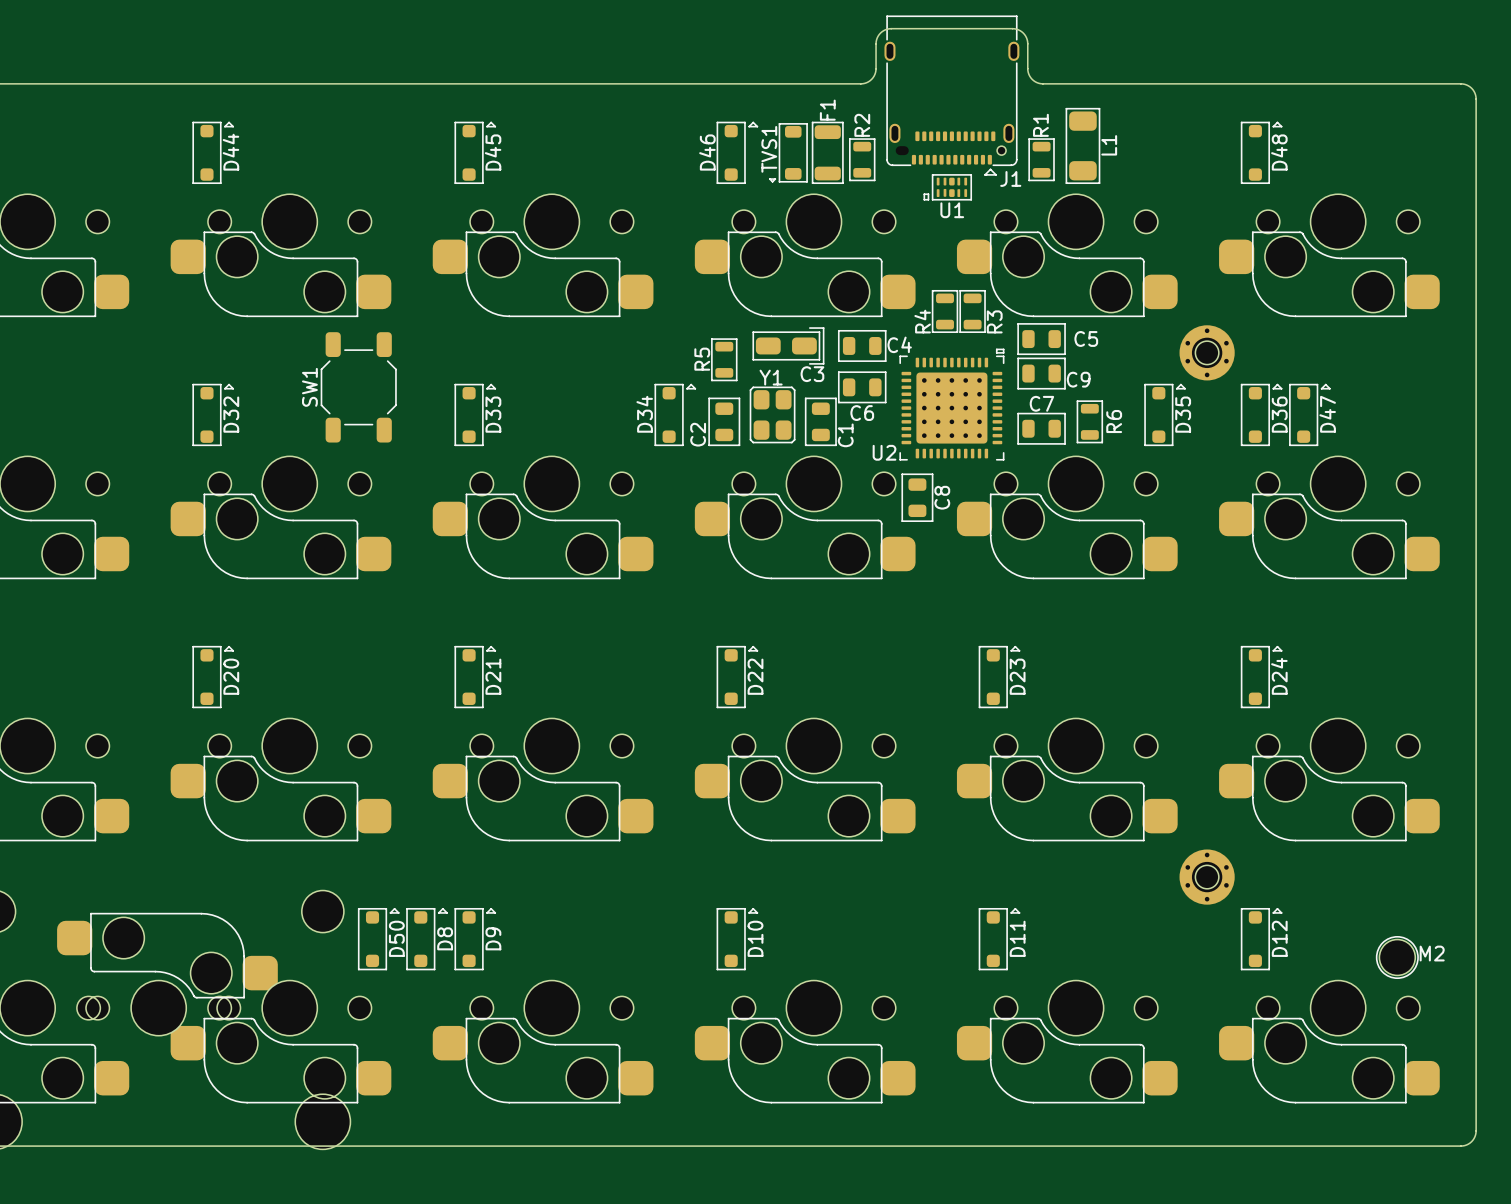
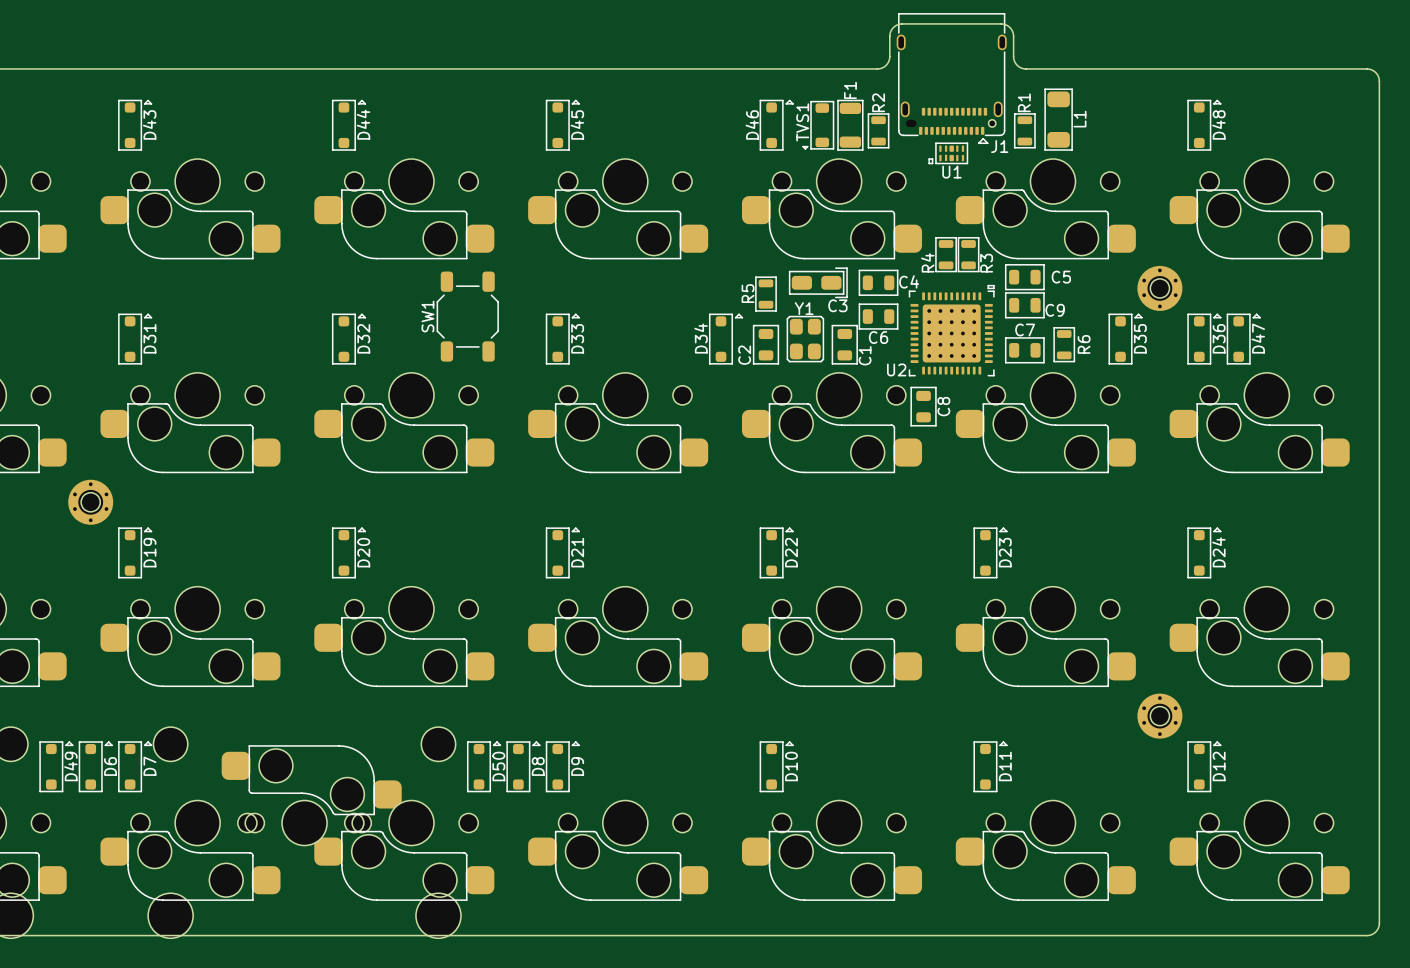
M2: (1397, 957) -> none

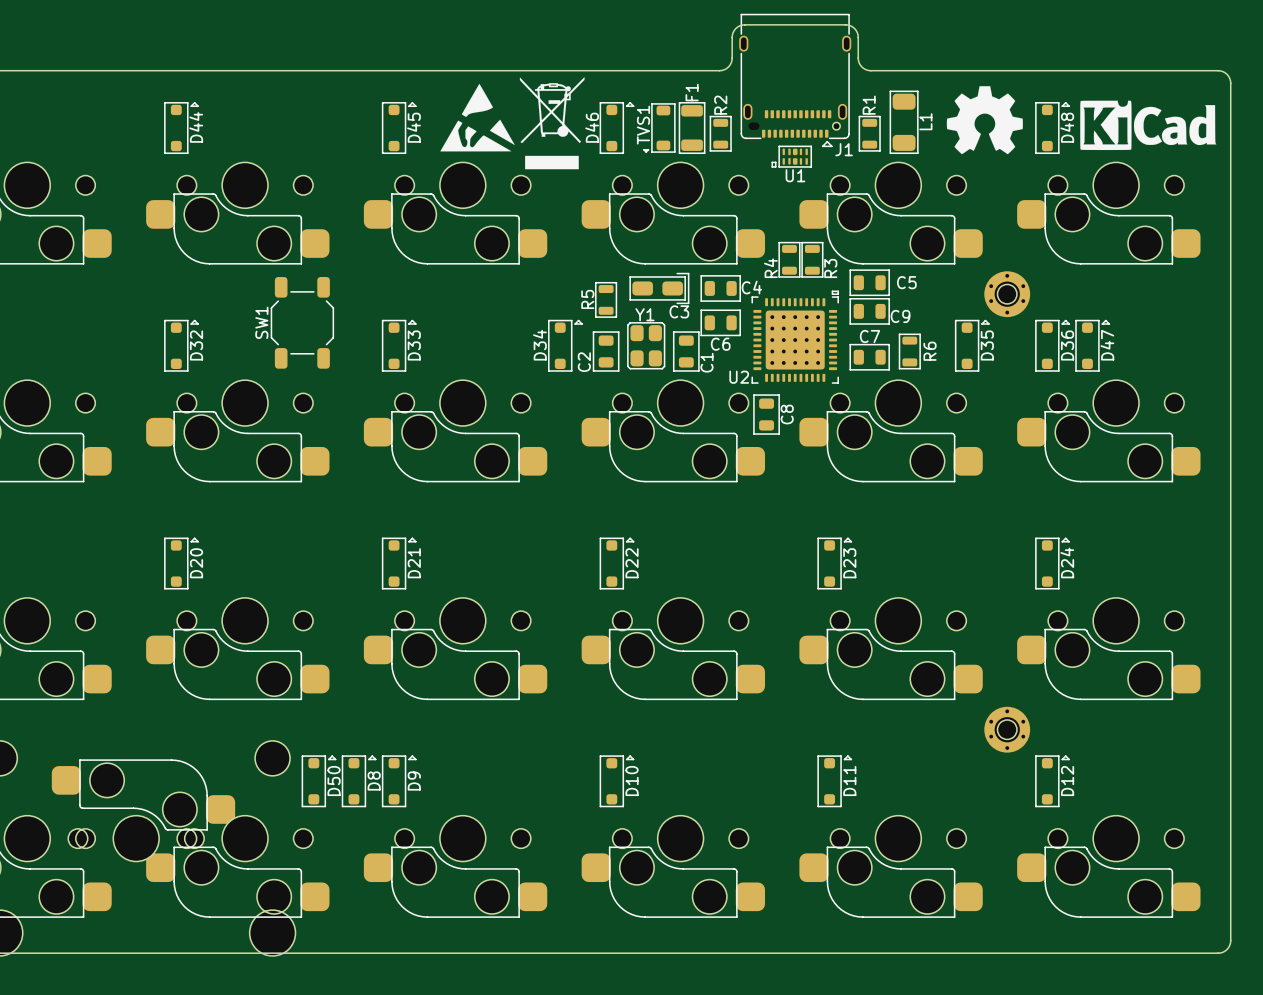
drawing: none -> [440, 77, 585, 170]
drawing: none -> [946, 86, 1023, 155]
drawing: none -> [1080, 100, 1217, 151]

